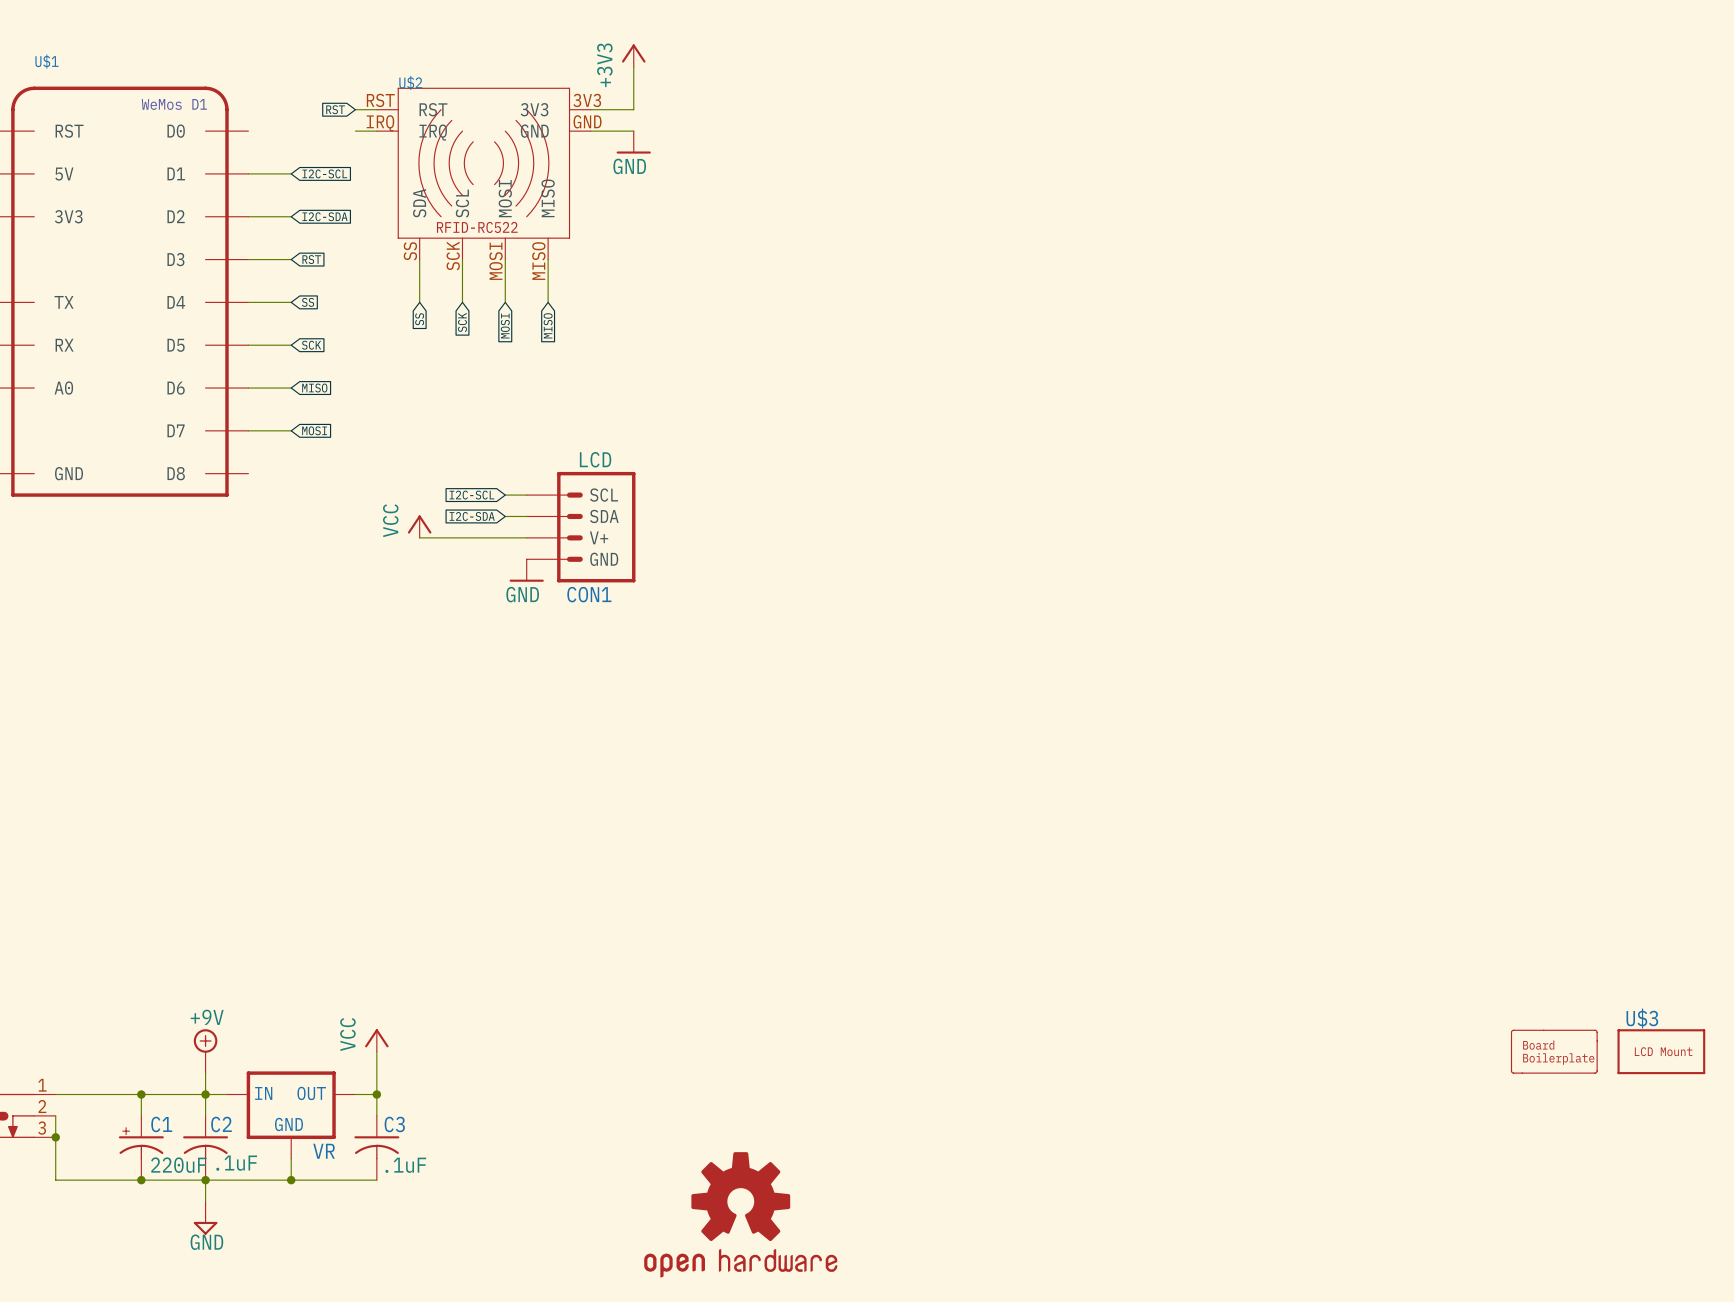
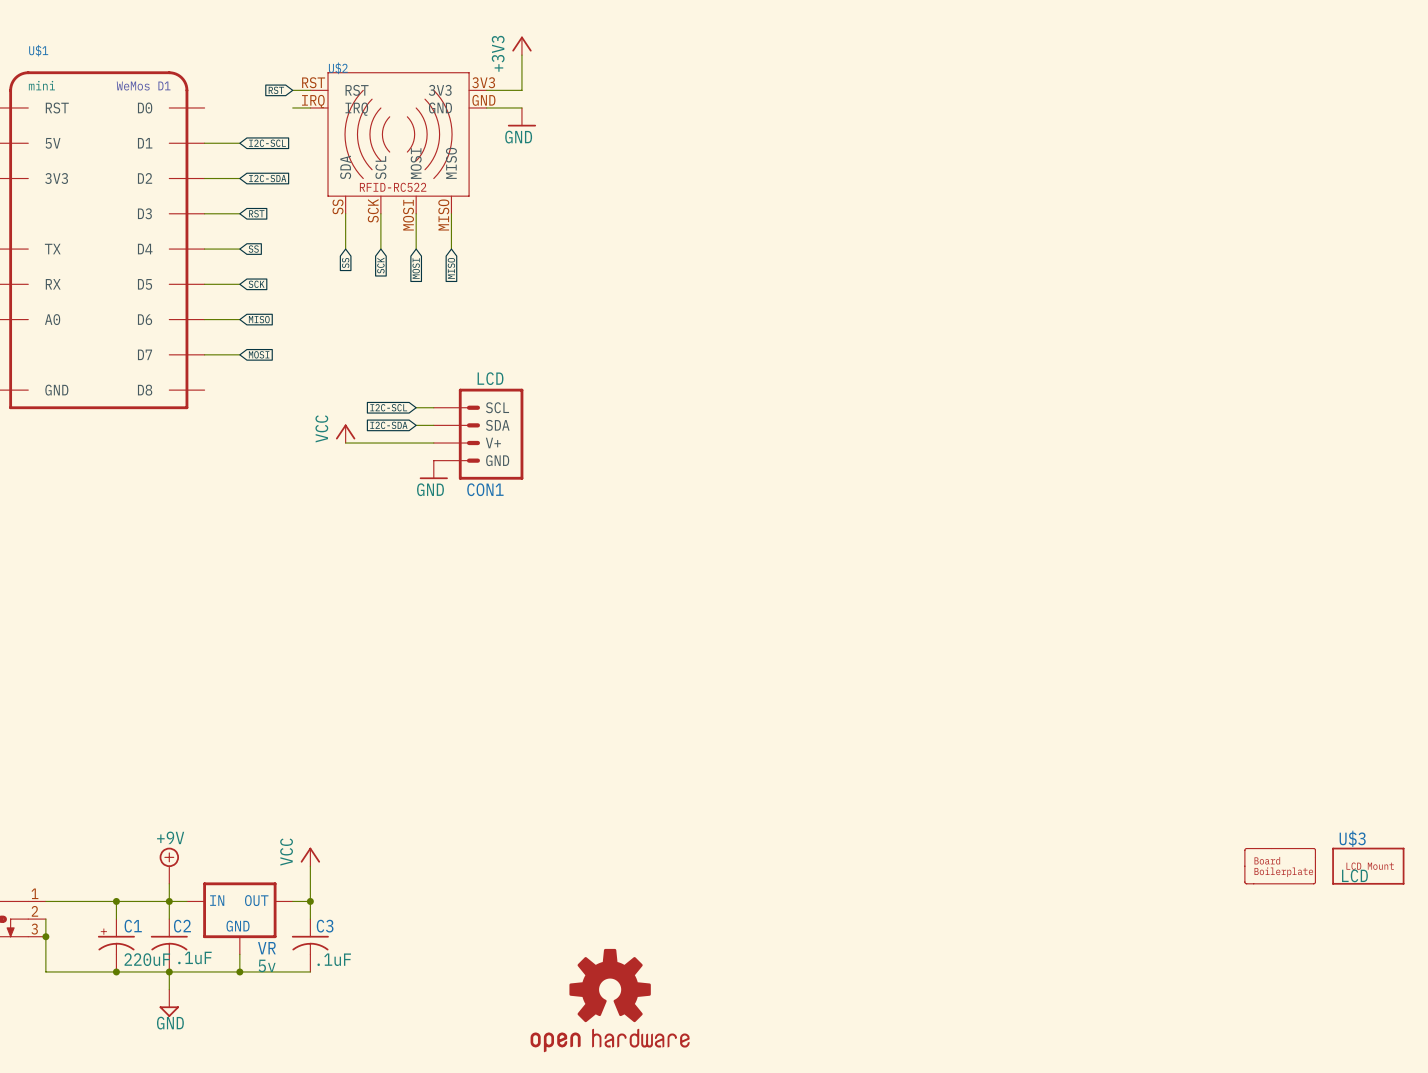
U$1 value: none -> mini (41, 85)
U$3 value: none -> LCD (1354, 875)
VR value: none -> 5v (267, 965)

